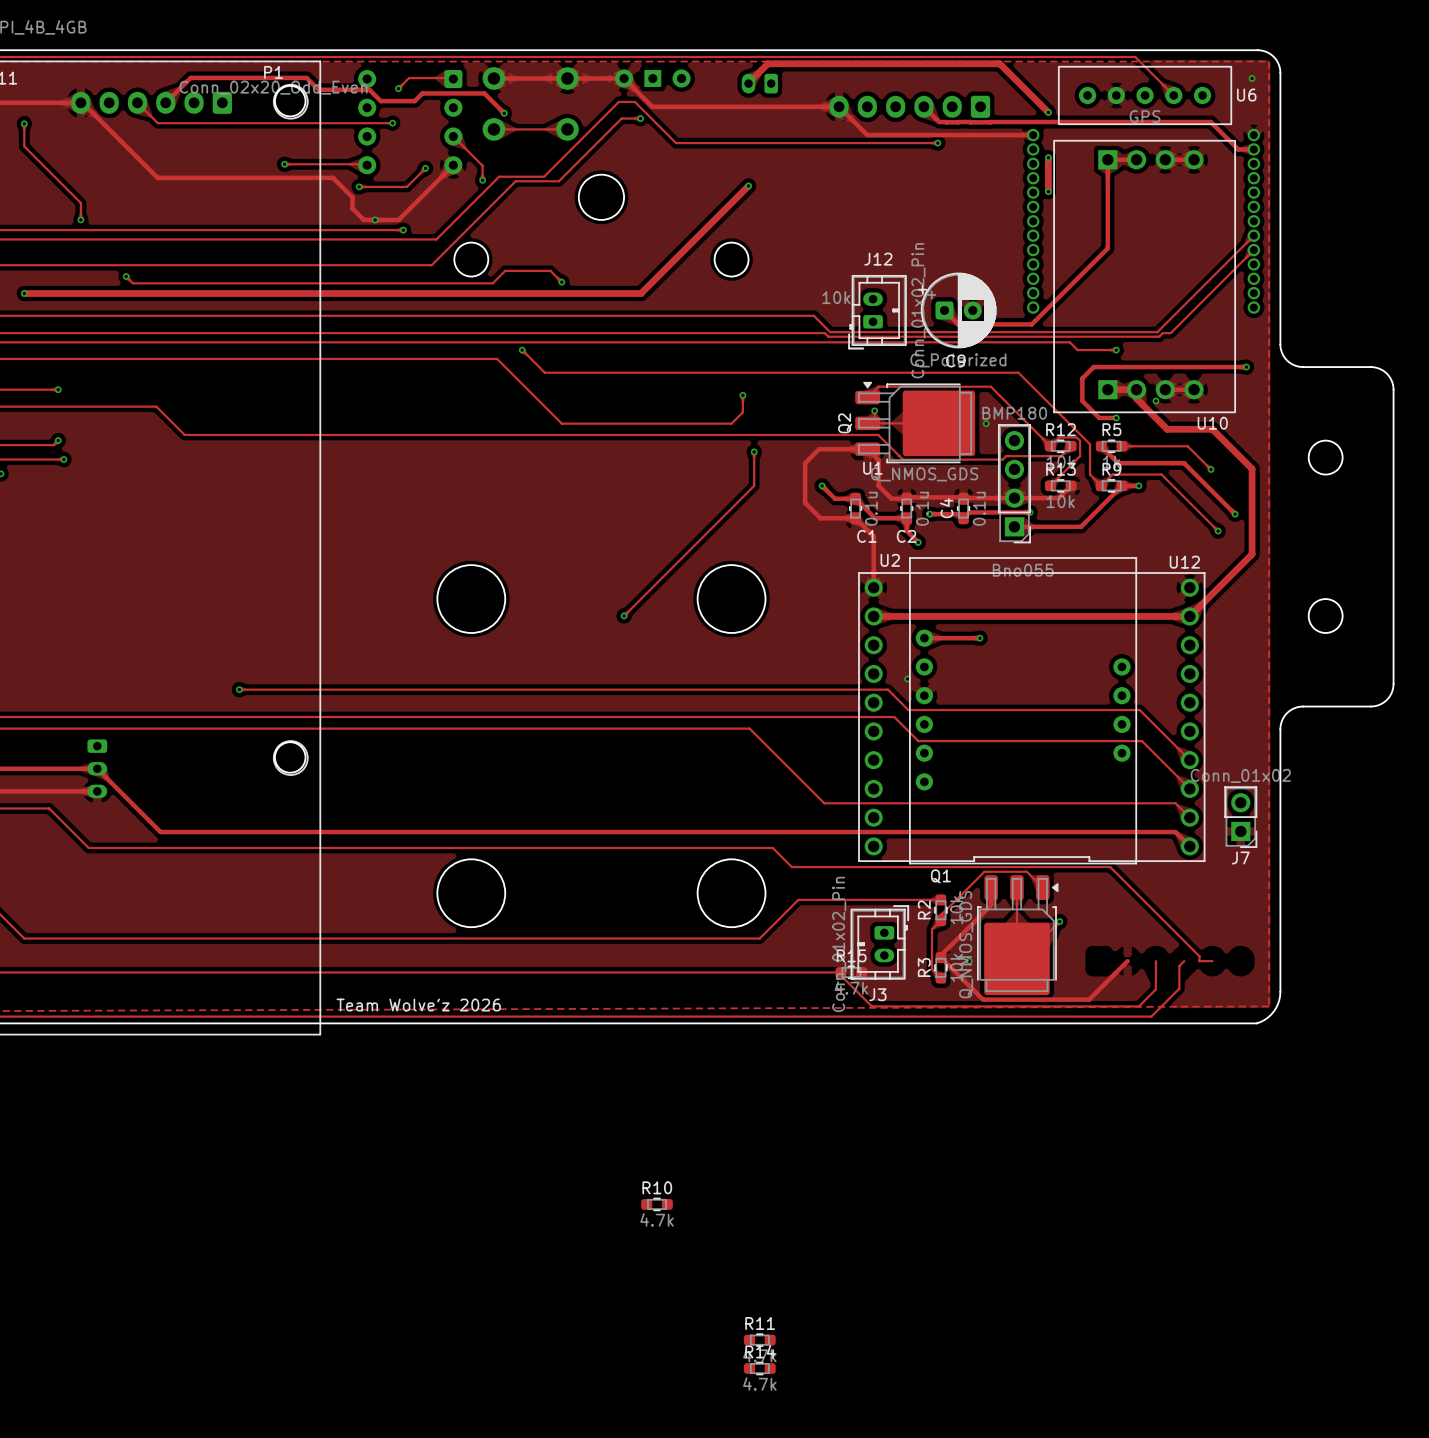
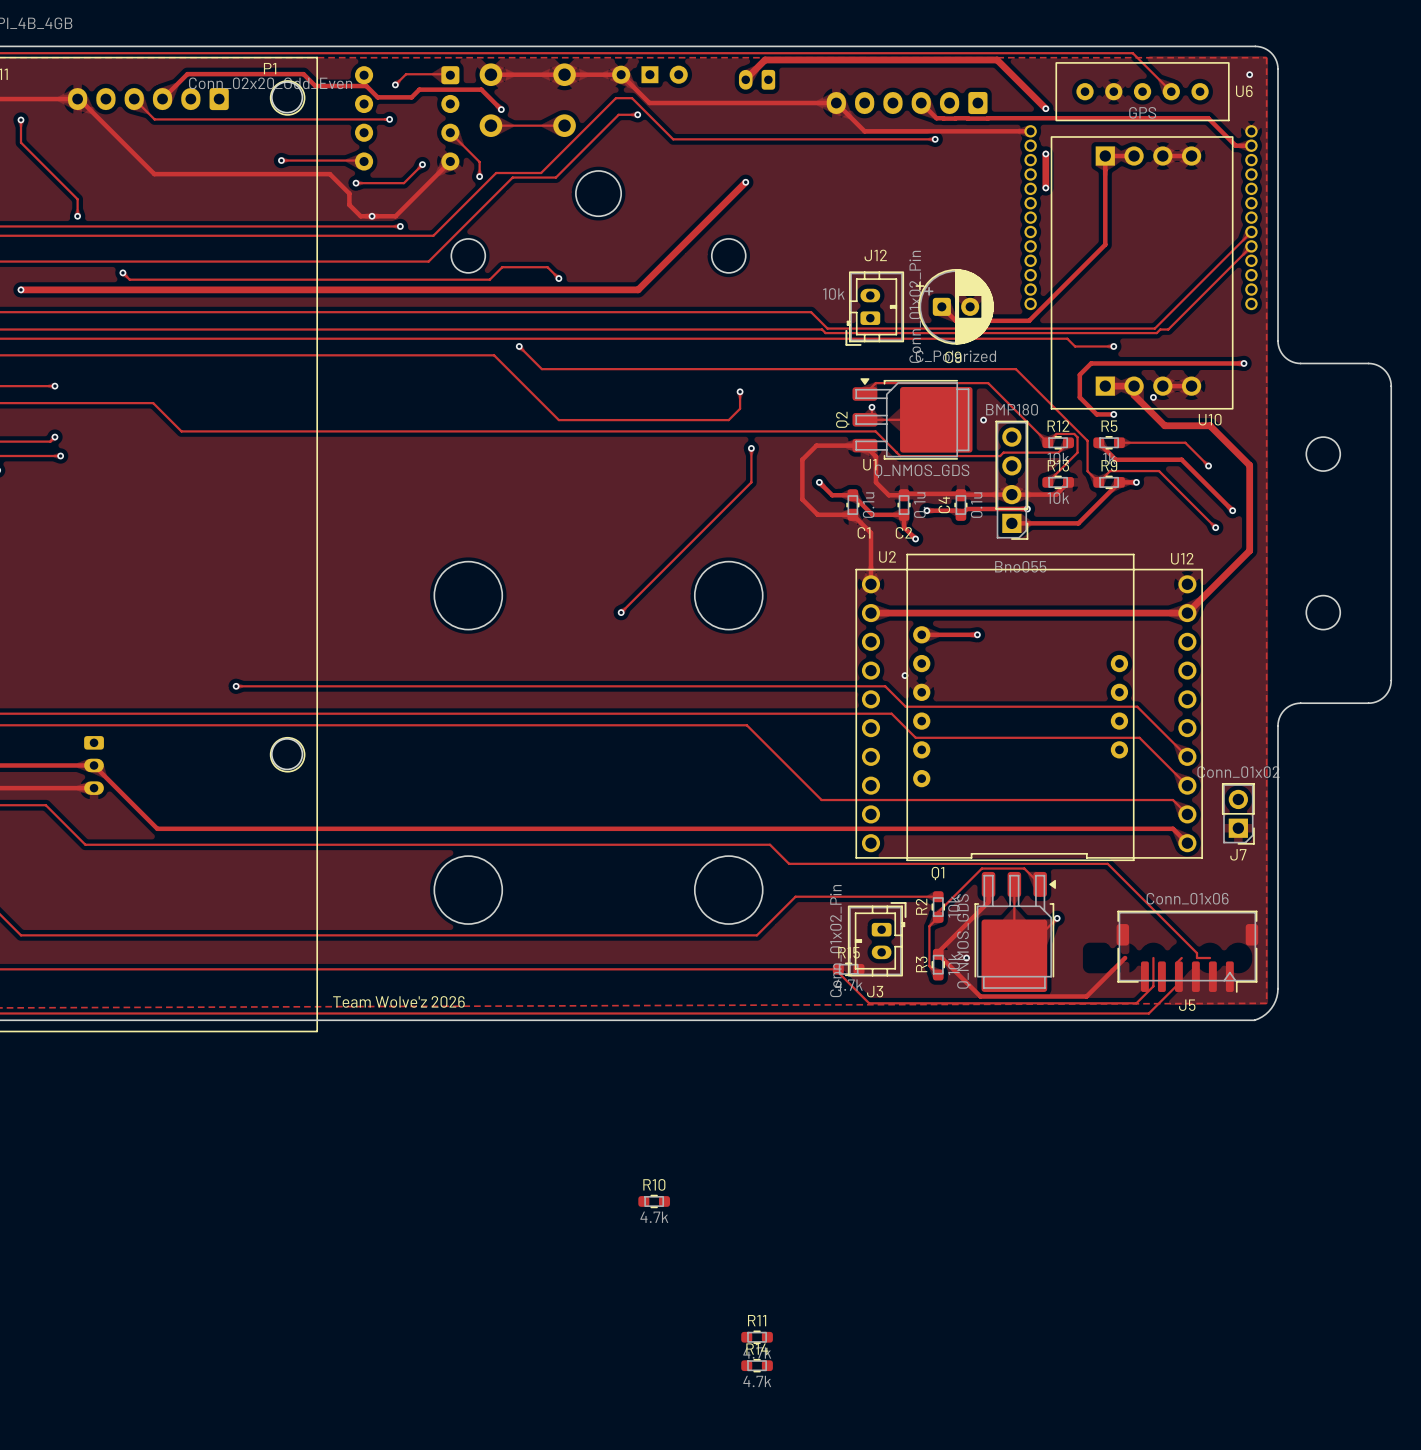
J5: none -> Conn_01x06 (1187, 951)

